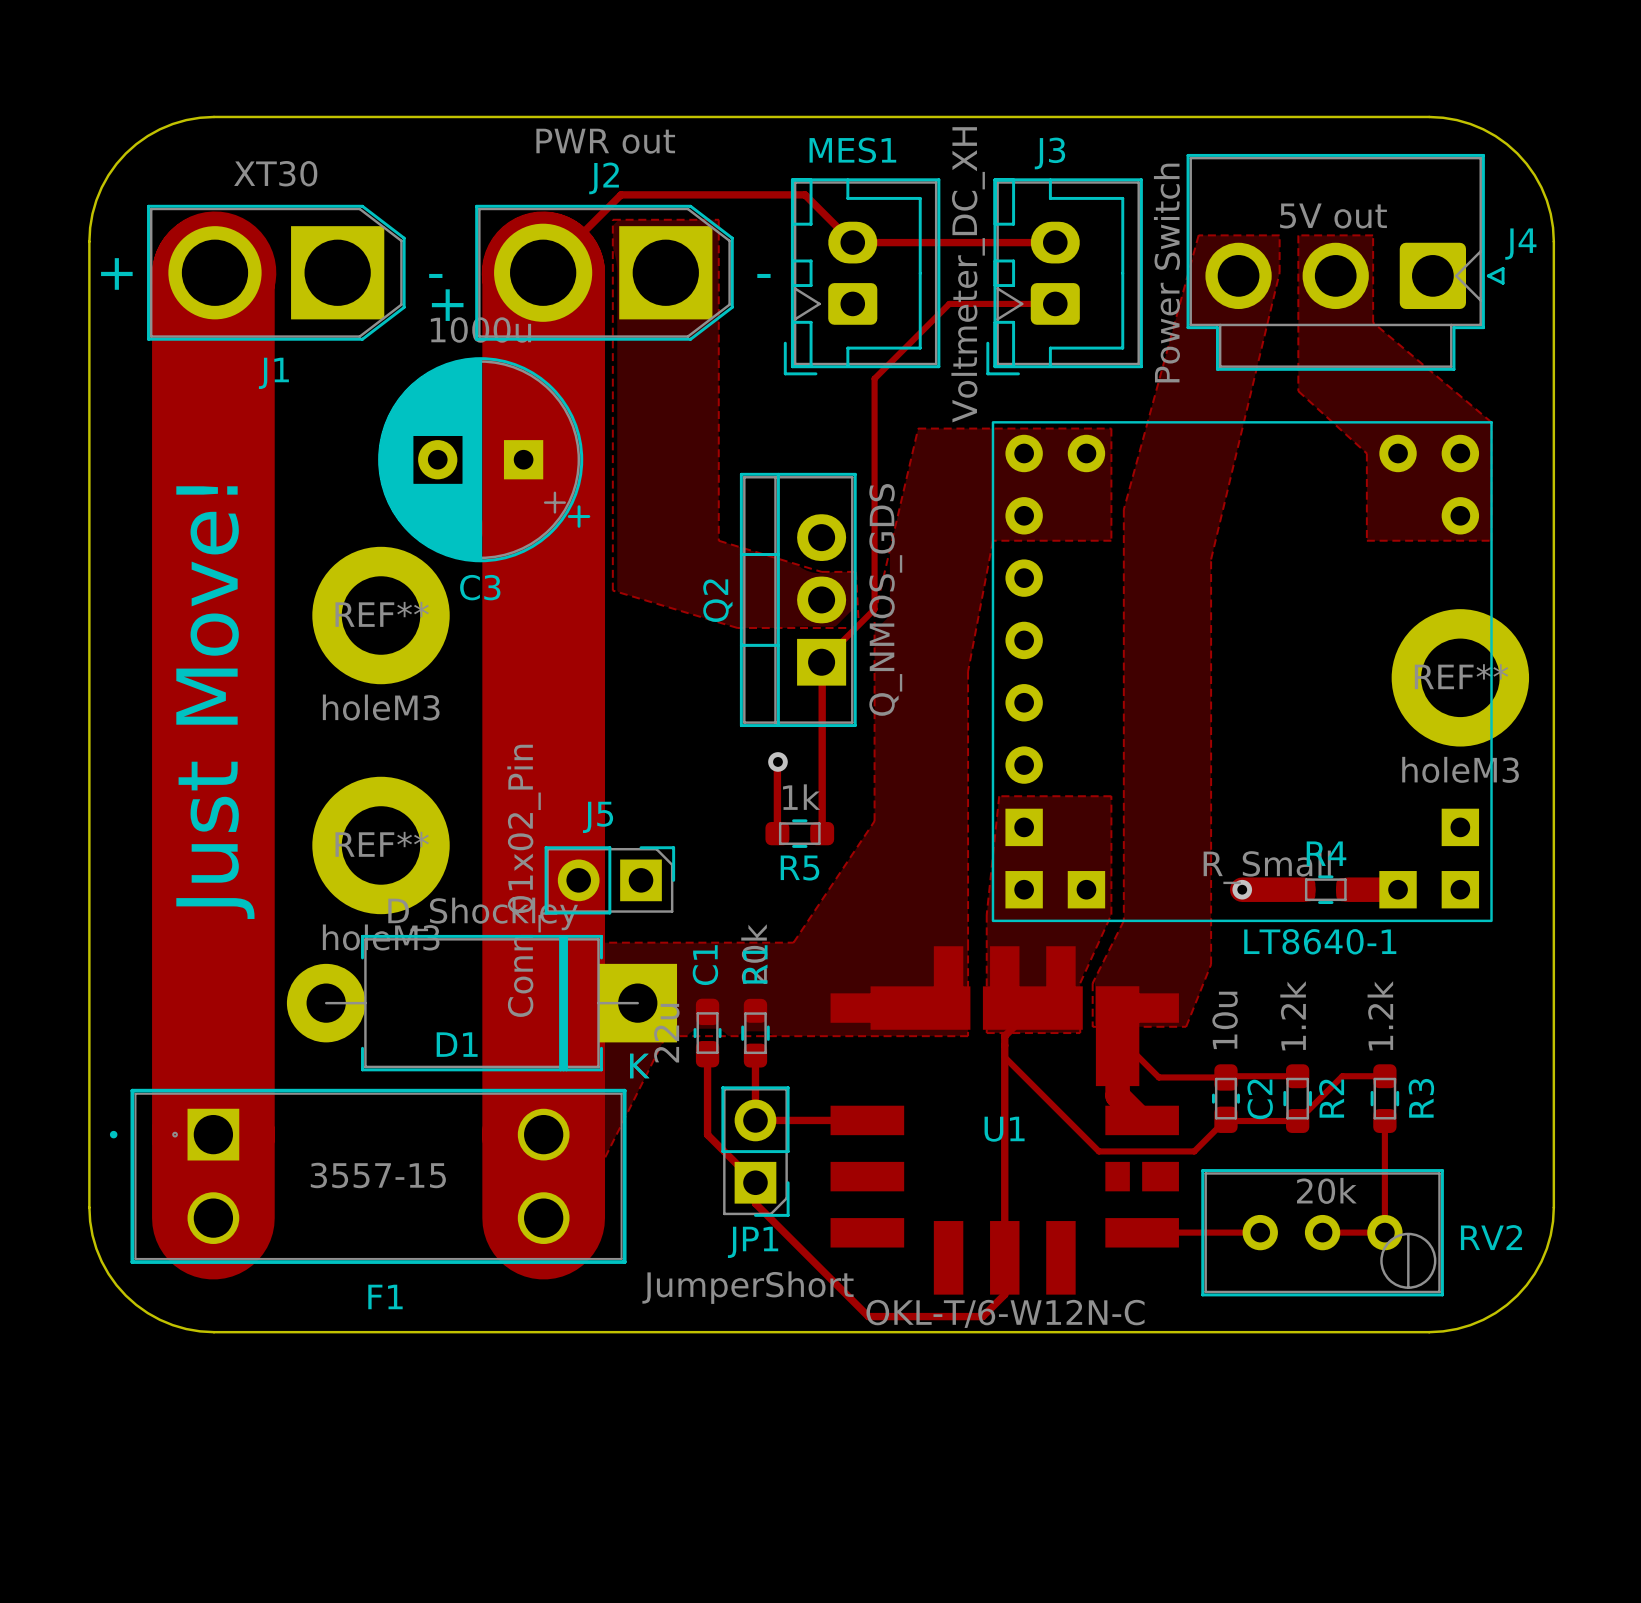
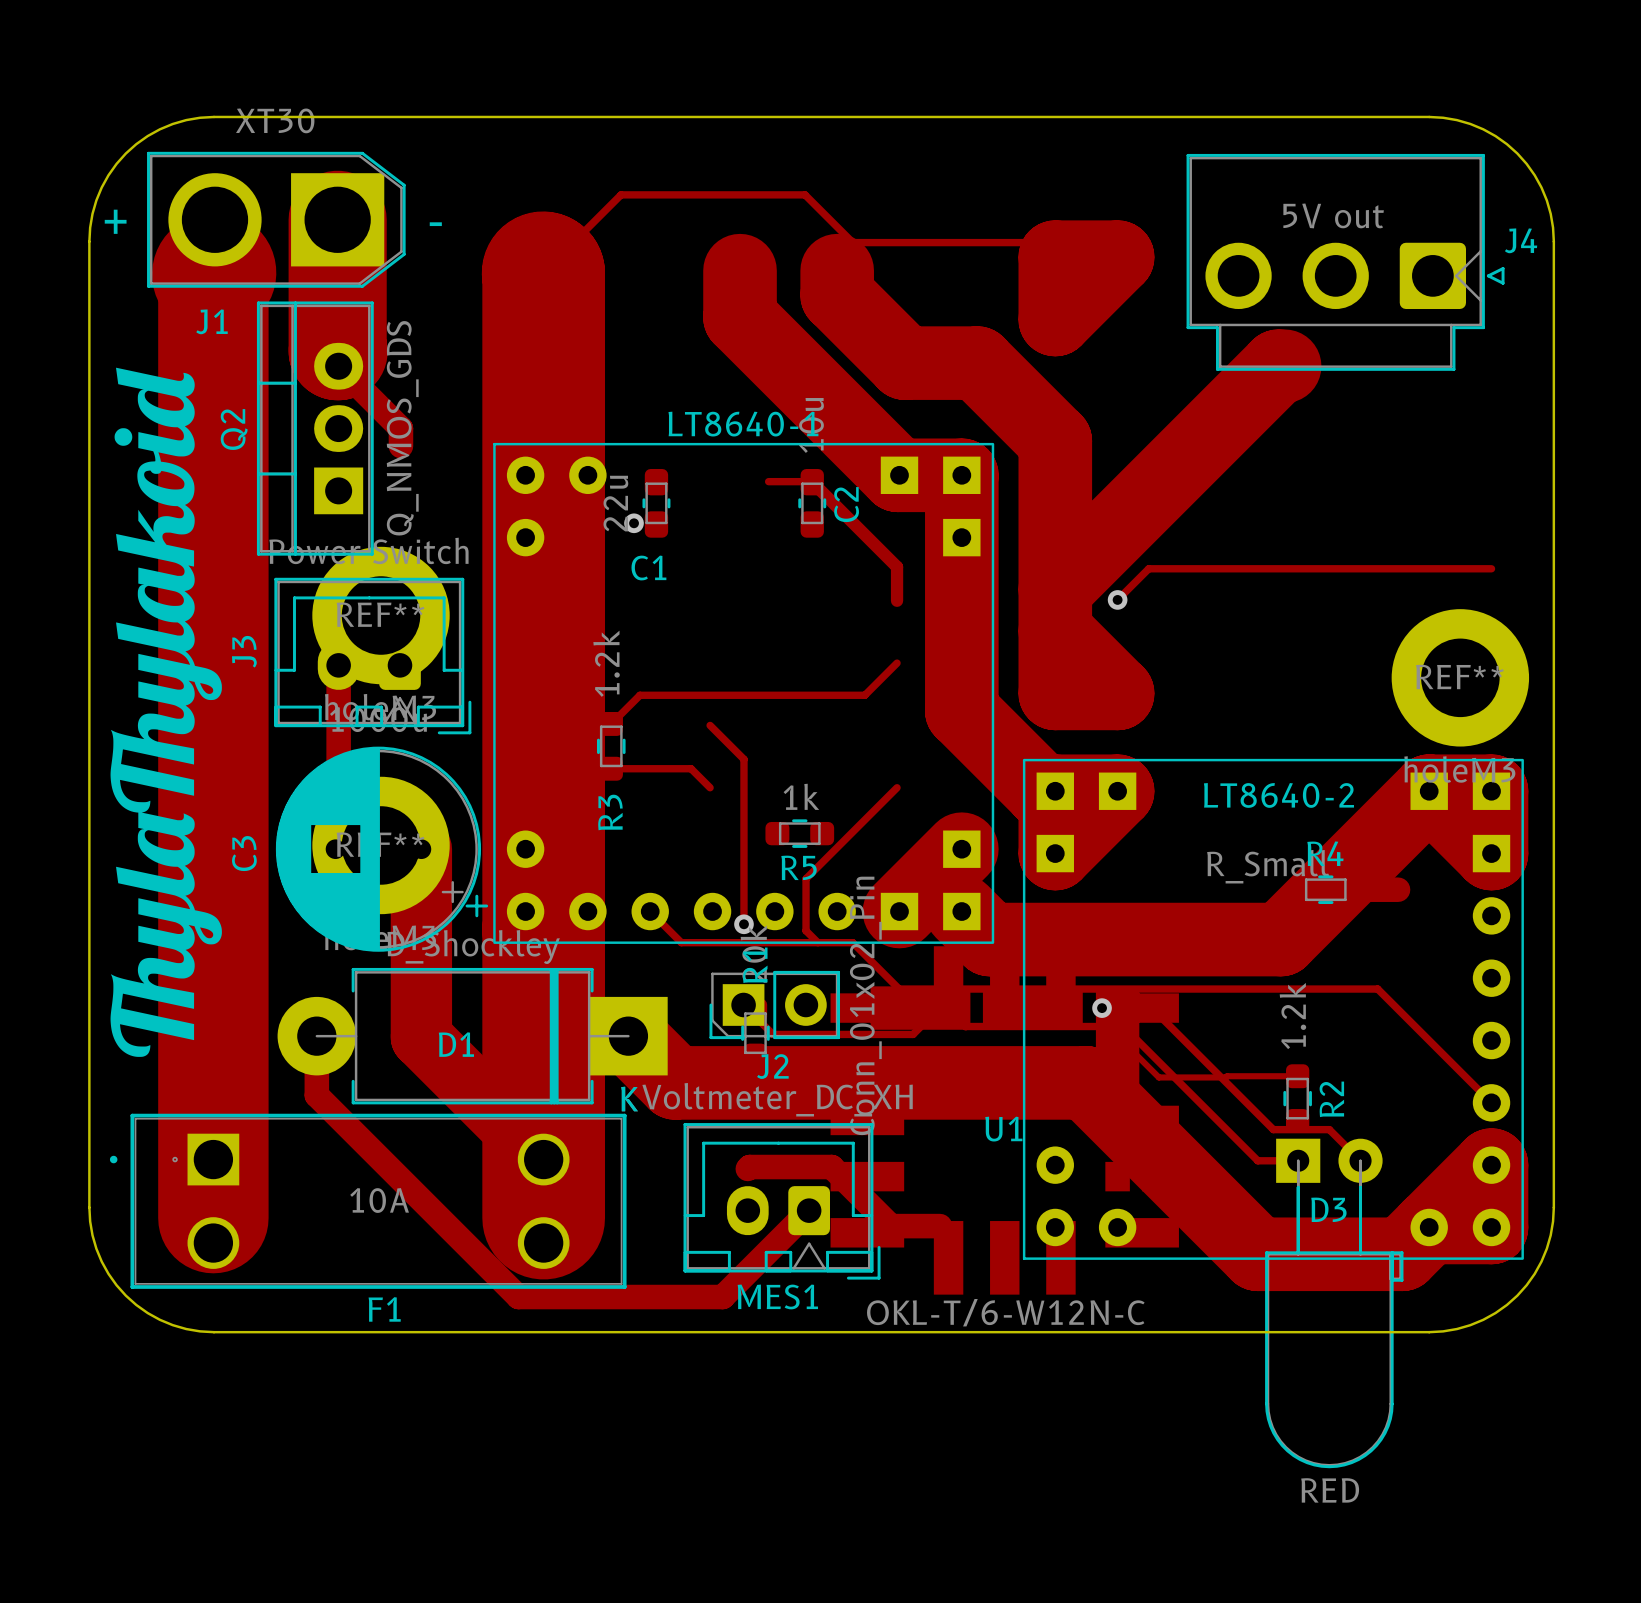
J2 value: PWR out (605, 141) -> Conn_01x02_Pin (865, 1005)
MES1 name position: MES1 (852, 150) -> MES1 (777, 1296)
J2 name position: J2 (604, 178) -> J2 (772, 1066)
J2 footprint: [475, 204, 734, 341] -> [709, 970, 841, 1040]
track: none -> (337, 219) (338, 351)
zone outline: (612, 219) (718, 219) (718, 540) (821, 571) (855, 571) (858, 627) (737, 627) (612, 590) (612, 219) -> none
zone outline: (1198, 235) (1279, 235) (1279, 272) (1211, 559) (1211, 964) (1186, 1026) (1092, 1026) (1092, 983) (1123, 920) (1123, 509) (1198, 235) -> none
zone outline: (1298, 235) (1373, 235) (1373, 322) (1491, 422) (1491, 540) (1366, 540) (1366, 453) (1298, 391) (1298, 235) -> none
track: none -> (1055, 257) (1055, 319) (1117, 257) (1055, 257)
track: none -> (740, 270) (740, 317) (897, 475) (961, 475) (961, 710) (1042, 791) (1117, 791) (1055, 853) (1055, 791)
track: none -> (837, 270) (837, 295) (904, 363) (977, 363) (1055, 441) (1055, 693) (1117, 693) (1055, 631)
J1 position: (276, 272) -> (276, 219)
track width: thick (213, 274) (213, 1218) -> thin (213, 274) (213, 1218)
MES1 rotation: 0° (862, 276) -> 90° counterclockwise (782, 1201)
MES1 position: (862, 276) -> (782, 1201)
J3 rotation: 0° (1064, 276) -> 90° counterclockwise (372, 656)
J3 position: (1064, 276) -> (372, 656)
track: (1055, 303) (949, 303) (874, 378) (874, 609) (821, 662) (822, 833) -> none
track: none -> (338, 366) (400, 428) (400, 446)
track: none -> (1284, 366) (1278, 366) (1055, 589)
drawing: none -> [110, 367, 222, 1057]
J1 name position: J1 (273, 373) -> J1 (211, 321)
LT8640-1 footprint: [991, 421, 1493, 923] -> [493, 442, 995, 944]
zone outline: (918, 428) (874, 615) (874, 821) (793, 942) (494, 942) (494, 1160) (603, 1160) (665, 1036) (968, 1036) (968, 671) (992, 540) (1111, 540) (1111, 428) (918, 428) -> none
C3 position: (484, 459) -> (382, 849)
track: none -> (768, 481) (811, 481) (897, 566) (897, 600)
via: none -> (634, 523)
track: none -> (1491, 568) (1148, 568) (1117, 599)
C3 name rotation: 0° (480, 587) -> 90° counterclockwise (244, 853)
C3 name position: C3 (480, 587) -> C3 (244, 853)
Q2 position: (798, 599) -> (315, 428)
via: none -> (1117, 599)
track: none -> (897, 663) (864, 695) (639, 695) (611, 723) (564, 723)
track: none -> (338, 665) (338, 766) (421, 849) (421, 1037) (543, 1159)
text: Just Move! (215, 702) -> none
track: none -> (710, 725) (743, 759) (743, 924)
track: (777, 761) (777, 833) -> none
via: (777, 761) -> none
track: none -> (611, 768) (691, 768) (710, 787)
track: none -> (897, 787) (806, 878) (806, 930) (817, 942)
track: none -> (1429, 791) (1491, 791) (1491, 853) (1429, 791)
track: none -> (1429, 791) (1280, 939) (989, 939) (961, 911)
zone outline: (999, 796) (1111, 796) (1111, 914) (1080, 983) (1080, 1033) (986, 1033) (986, 914) (999, 796) -> none
track: none -> (961, 849) (899, 911)
J5: Conn_01x02_Pin (609, 880) -> none
track: (1242, 889) (1303, 889) -> none
via: (1242, 889) -> none
track: none -> (650, 911) (681, 942) (852, 942) (899, 989) (1377, 989) (1491, 1102)
via: none -> (743, 924)
LT8640-1 name position: LT8640-1 (1320, 941) -> LT8640-1 (743, 424)
C1 name rotation: 0° (705, 965) -> 90° clockwise (648, 567)
C1 name position: C1 (705, 965) -> C1 (648, 567)
D1 position: (481, 1003) -> (472, 1036)
track: none -> (743, 1005) (773, 1034) (913, 1034) (920, 1026)
track: (1032, 1008) (1004, 1036) (1004, 1294) (982, 1316) (868, 1316) (755, 1203) (755, 1182) (707, 1134) (707, 1054) -> none
track: none -> (1102, 1008) (1151, 1008) (1273, 1129) (1329, 1129) (1360, 1160)
via: none -> (1102, 1008)
LT8640-2: none -> (1273, 1009)
track: none -> (965, 1026) (1123, 1026) (1257, 1160) (1298, 1160)
C1 position: (707, 1033) -> (656, 503)
track: none -> (316, 1036) (316, 1095) (518, 1297) (722, 1297) (809, 1210)
track: none -> (628, 1036) (675, 1082) (1086, 1082) (1257, 1254) (1402, 1254) (1491, 1165) (1491, 1227) (1429, 1227)
track: (1004, 1045) (1004, 1057) (1098, 1151) (1194, 1151) (1225, 1119) (1297, 1121) (1342, 1076) (1384, 1076) -> none
track: (755, 1055) (755, 1120) (867, 1120) -> none
C2 position: (1225, 1098) -> (812, 503)
R3 position: (1384, 1098) -> (611, 746)
R3 name position: R3 (1421, 1098) -> R3 (610, 812)
track: (1384, 1121) (1384, 1232) (1322, 1232) -> none
JP1: JumperShort (755, 1151) -> none
track: none -> (747, 1168) (749, 1167) (831, 1167) (890, 1226) (940, 1226)
F1 value: 3557-15 (378, 1175) -> 10A (379, 1200)
F1 position: (368, 1176) -> (368, 1201)
track: (1142, 1232) (1260, 1232) -> none
RV2: 20k (1322, 1232) -> none
F1 name position: F1 (385, 1296) -> F1 (384, 1309)
D3: none -> RED (1334, 1303)

